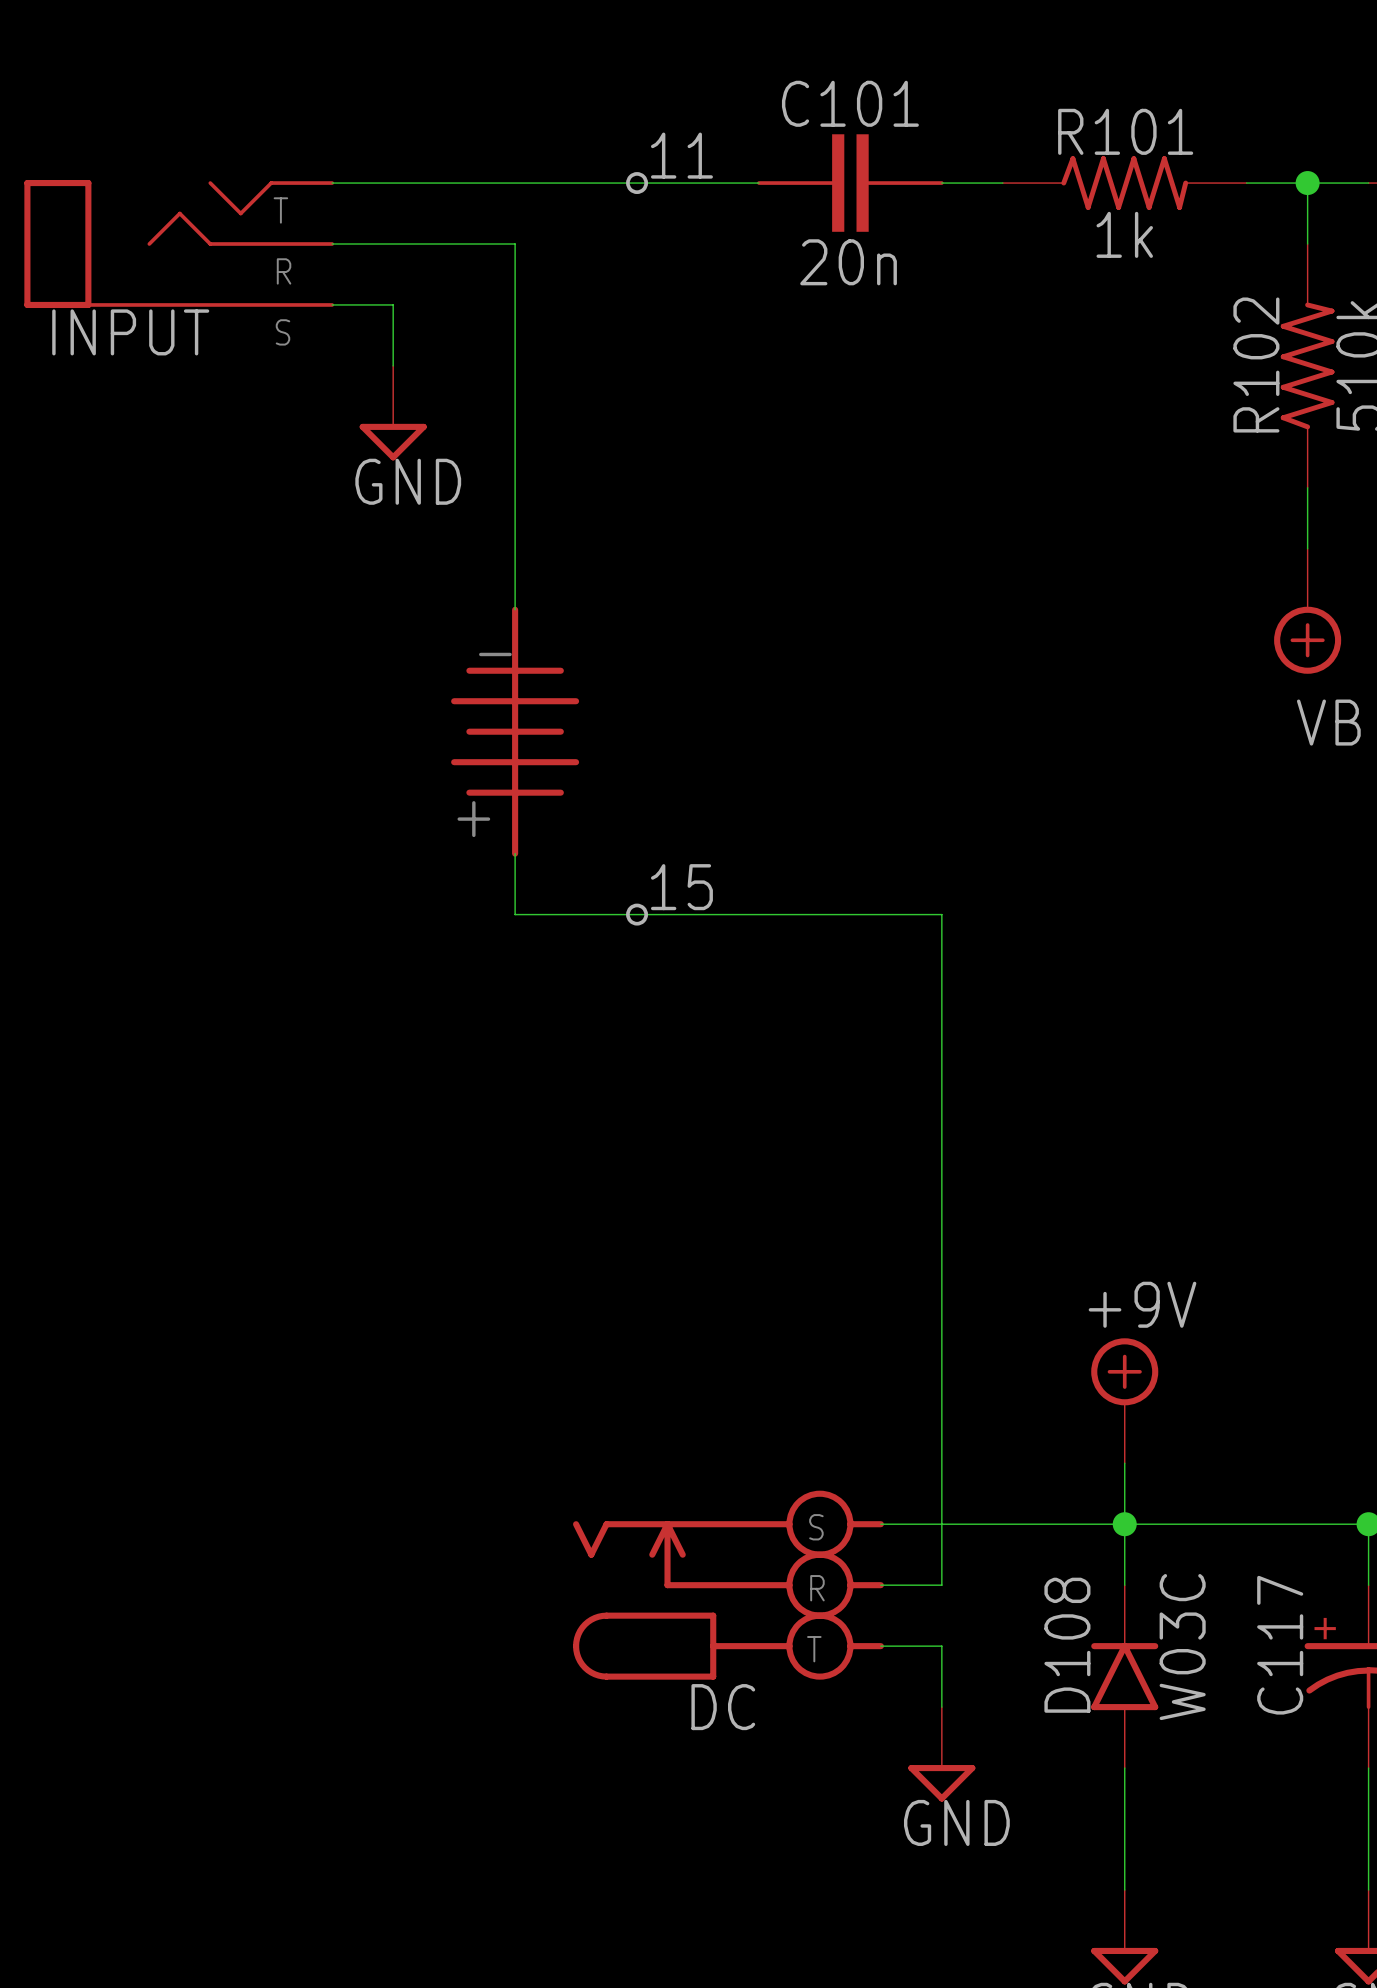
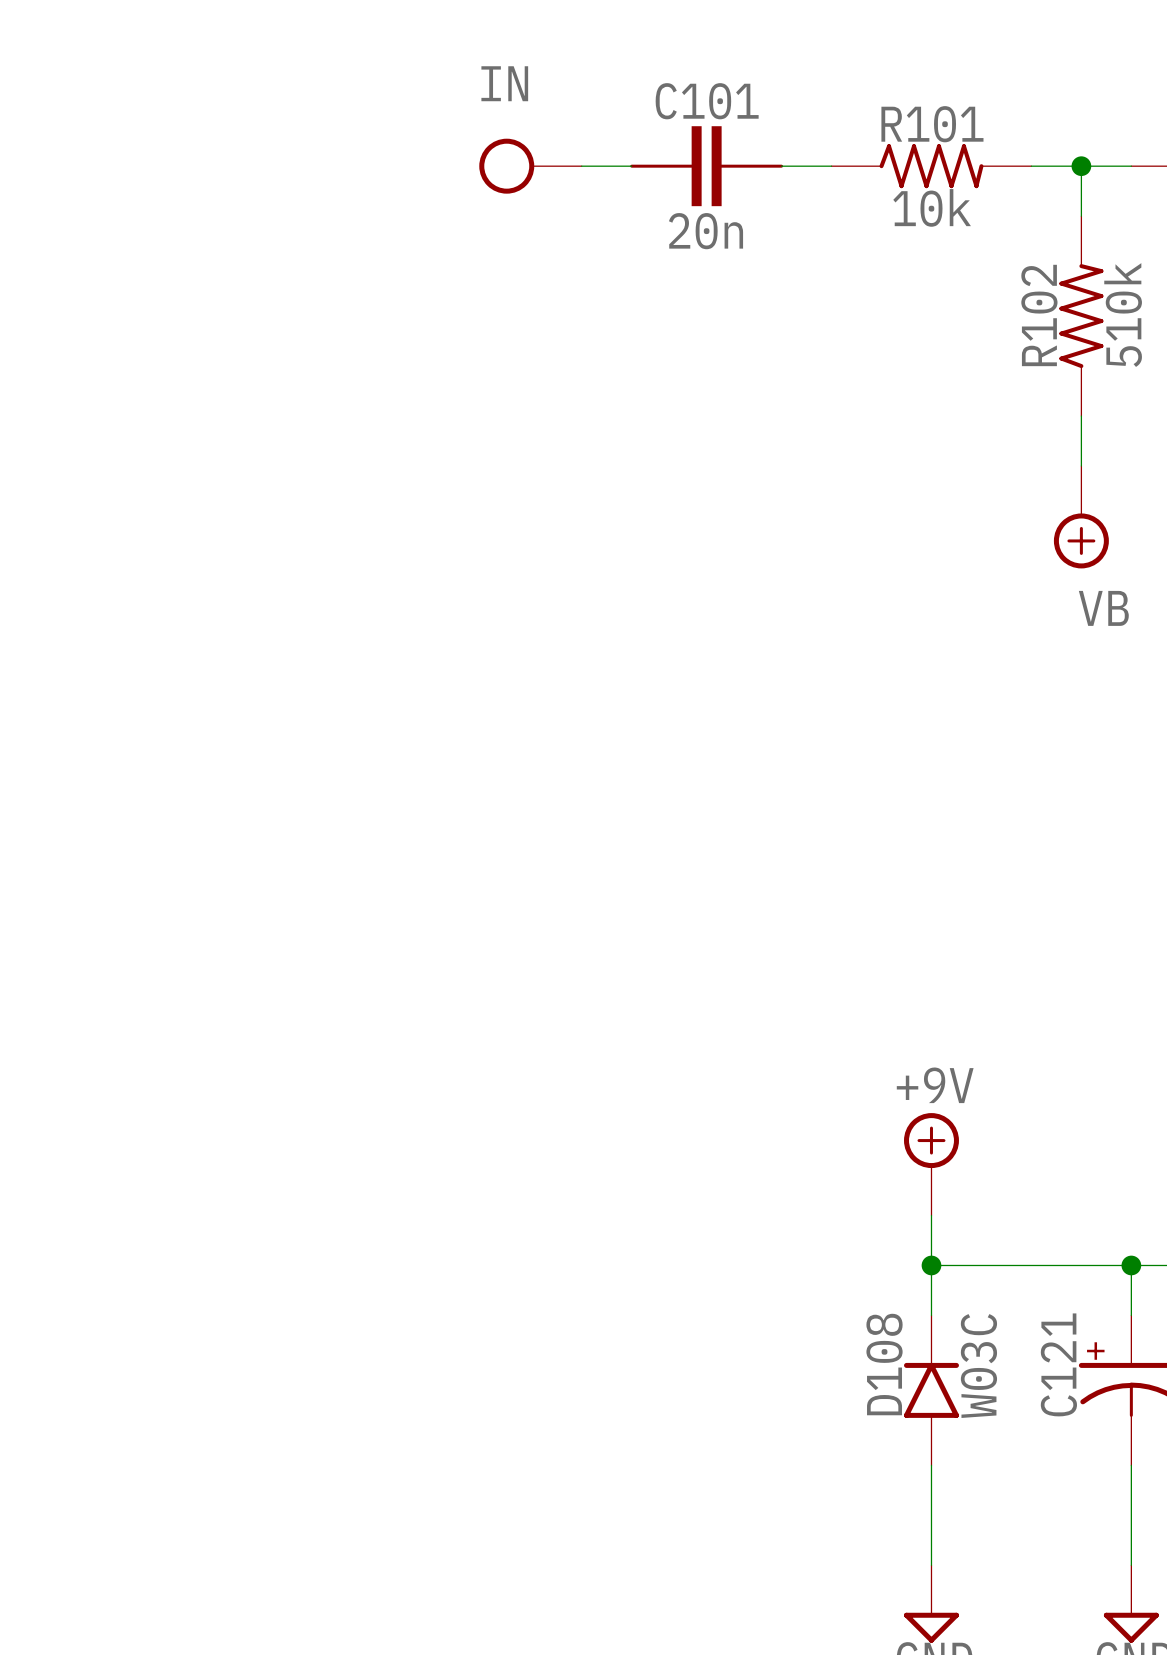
text: 11 (681, 155) -> none
drawing: [626, 172, 649, 195] -> none
wire: (332, 183) (697, 183) -> none
IN: none -> (530, 166)
R101 value: 1k (1124, 234) -> 10k (932, 207)
INPUT: (179, 244) -> none
wire: (332, 244) (515, 244) (515, 609) -> none
wire: (332, 304) (393, 304) (393, 365) -> none
power symbol: GND (393, 413) -> none
part: (515, 731) -> none
wire: (515, 853) (515, 914) (941, 914) (941, 1585) (880, 1585) -> none
text: 15 (681, 887) -> none
drawing: [626, 903, 649, 926] -> none
wire: (880, 1524) (1124, 1524) -> none
DC: (728, 1585) -> none
C117 name: C117 (1280, 1645) -> C121 (1058, 1364)
wire: (880, 1646) (941, 1646) (941, 1707) -> none
power symbol: GND (941, 1754) -> none

